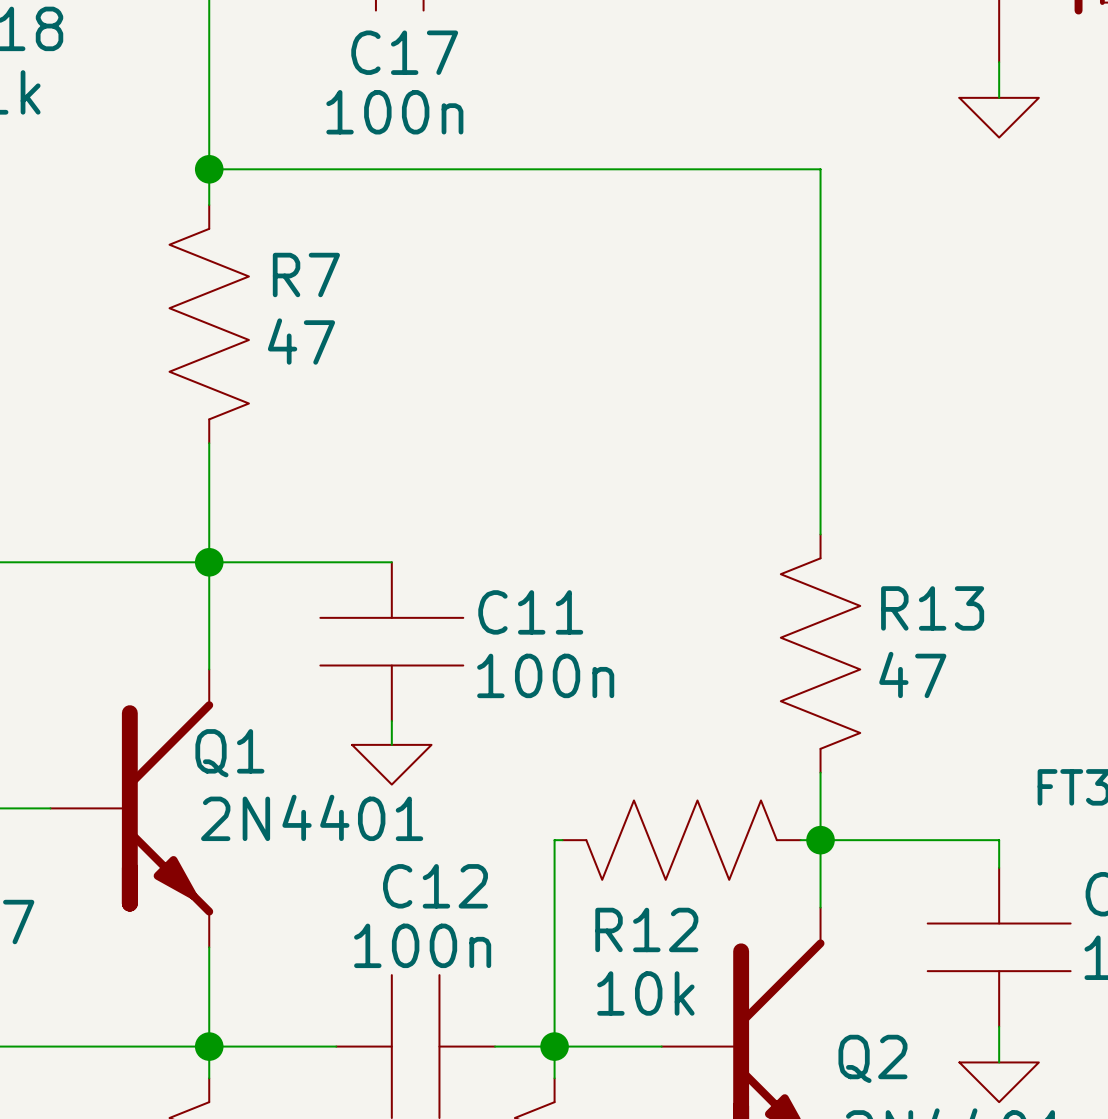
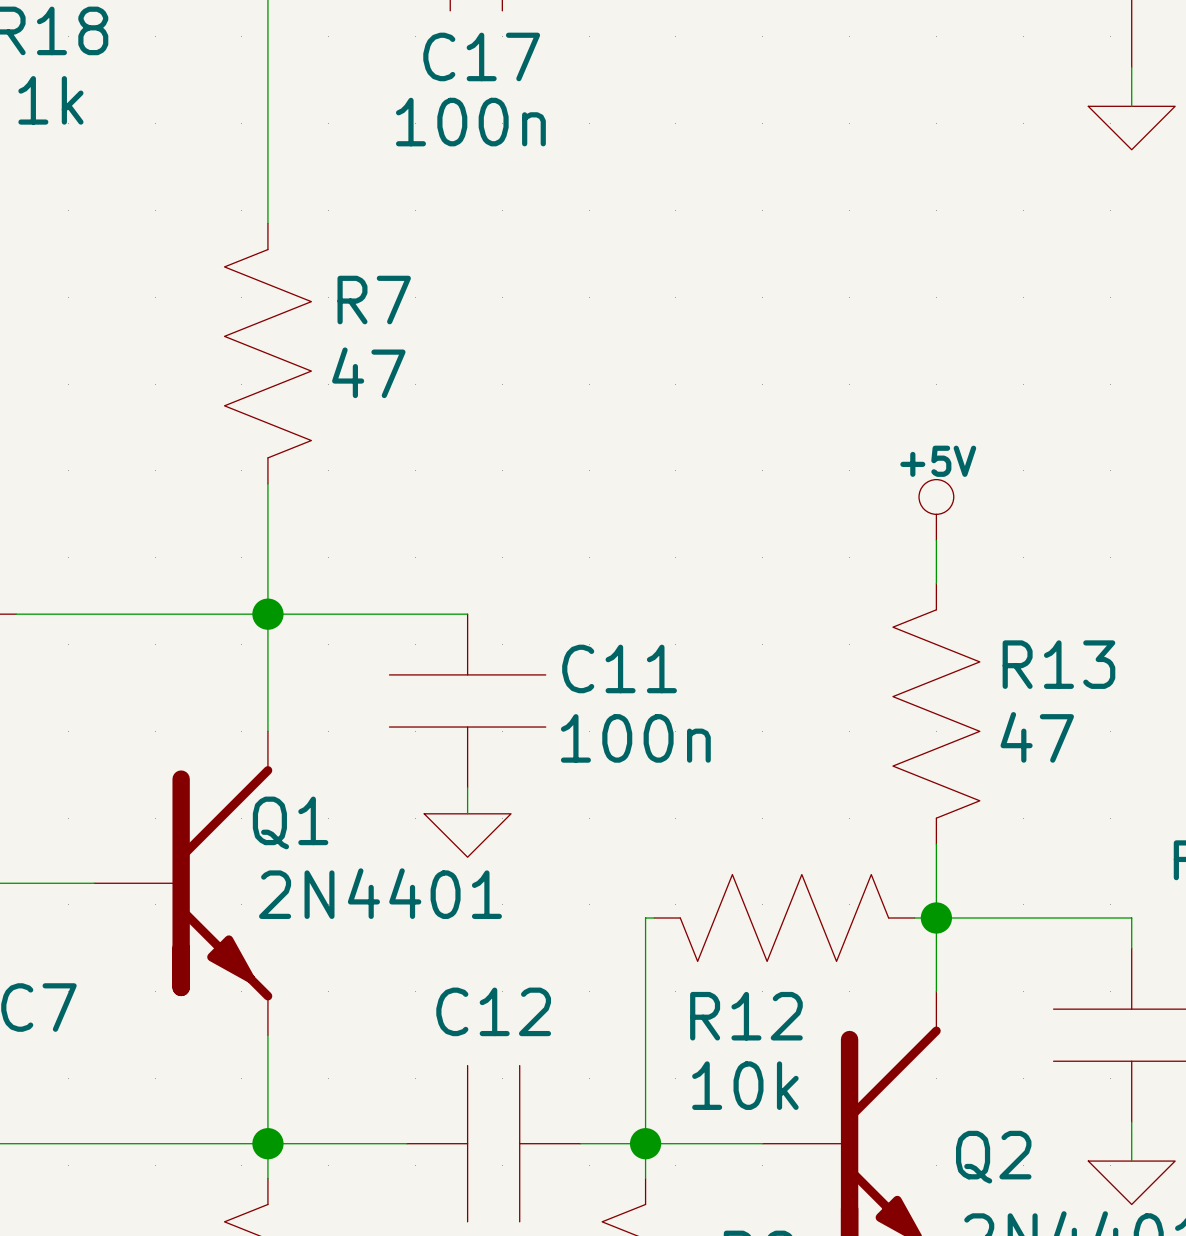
wire: (209, 169) (820, 169) (820, 494) -> none
junction: (209, 169) -> none
power symbol: none -> +5V (936, 509)
C12 name position: C12 (435, 886) -> C12 (493, 1011)
C12 value: 100n (422, 945) -> none

